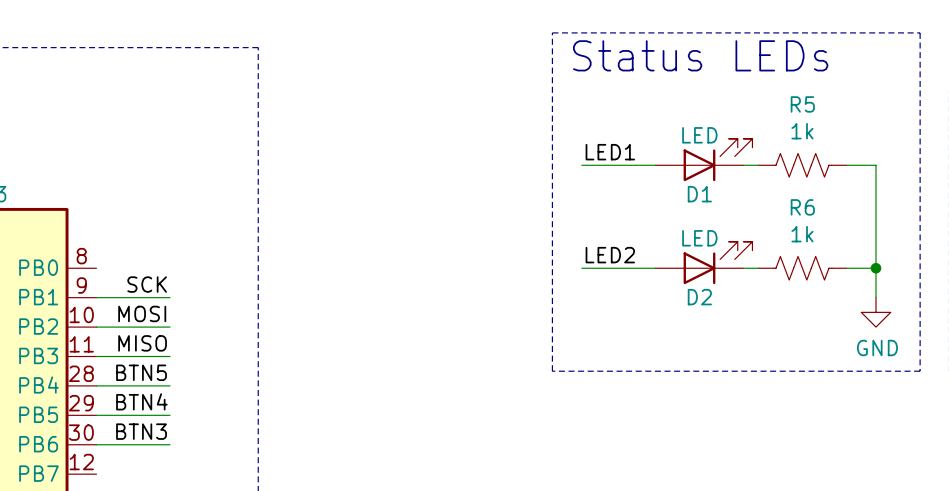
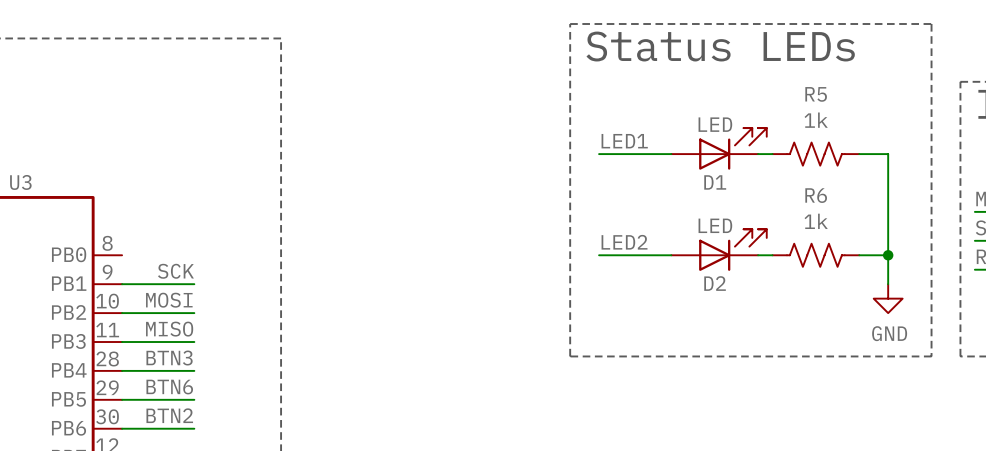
label: BTN5 (141, 372) -> BTN3 (169, 358)
label: BTN4 (141, 401) -> BTN6 (169, 387)
label: BTN3 (141, 431) -> BTN2 (169, 415)

